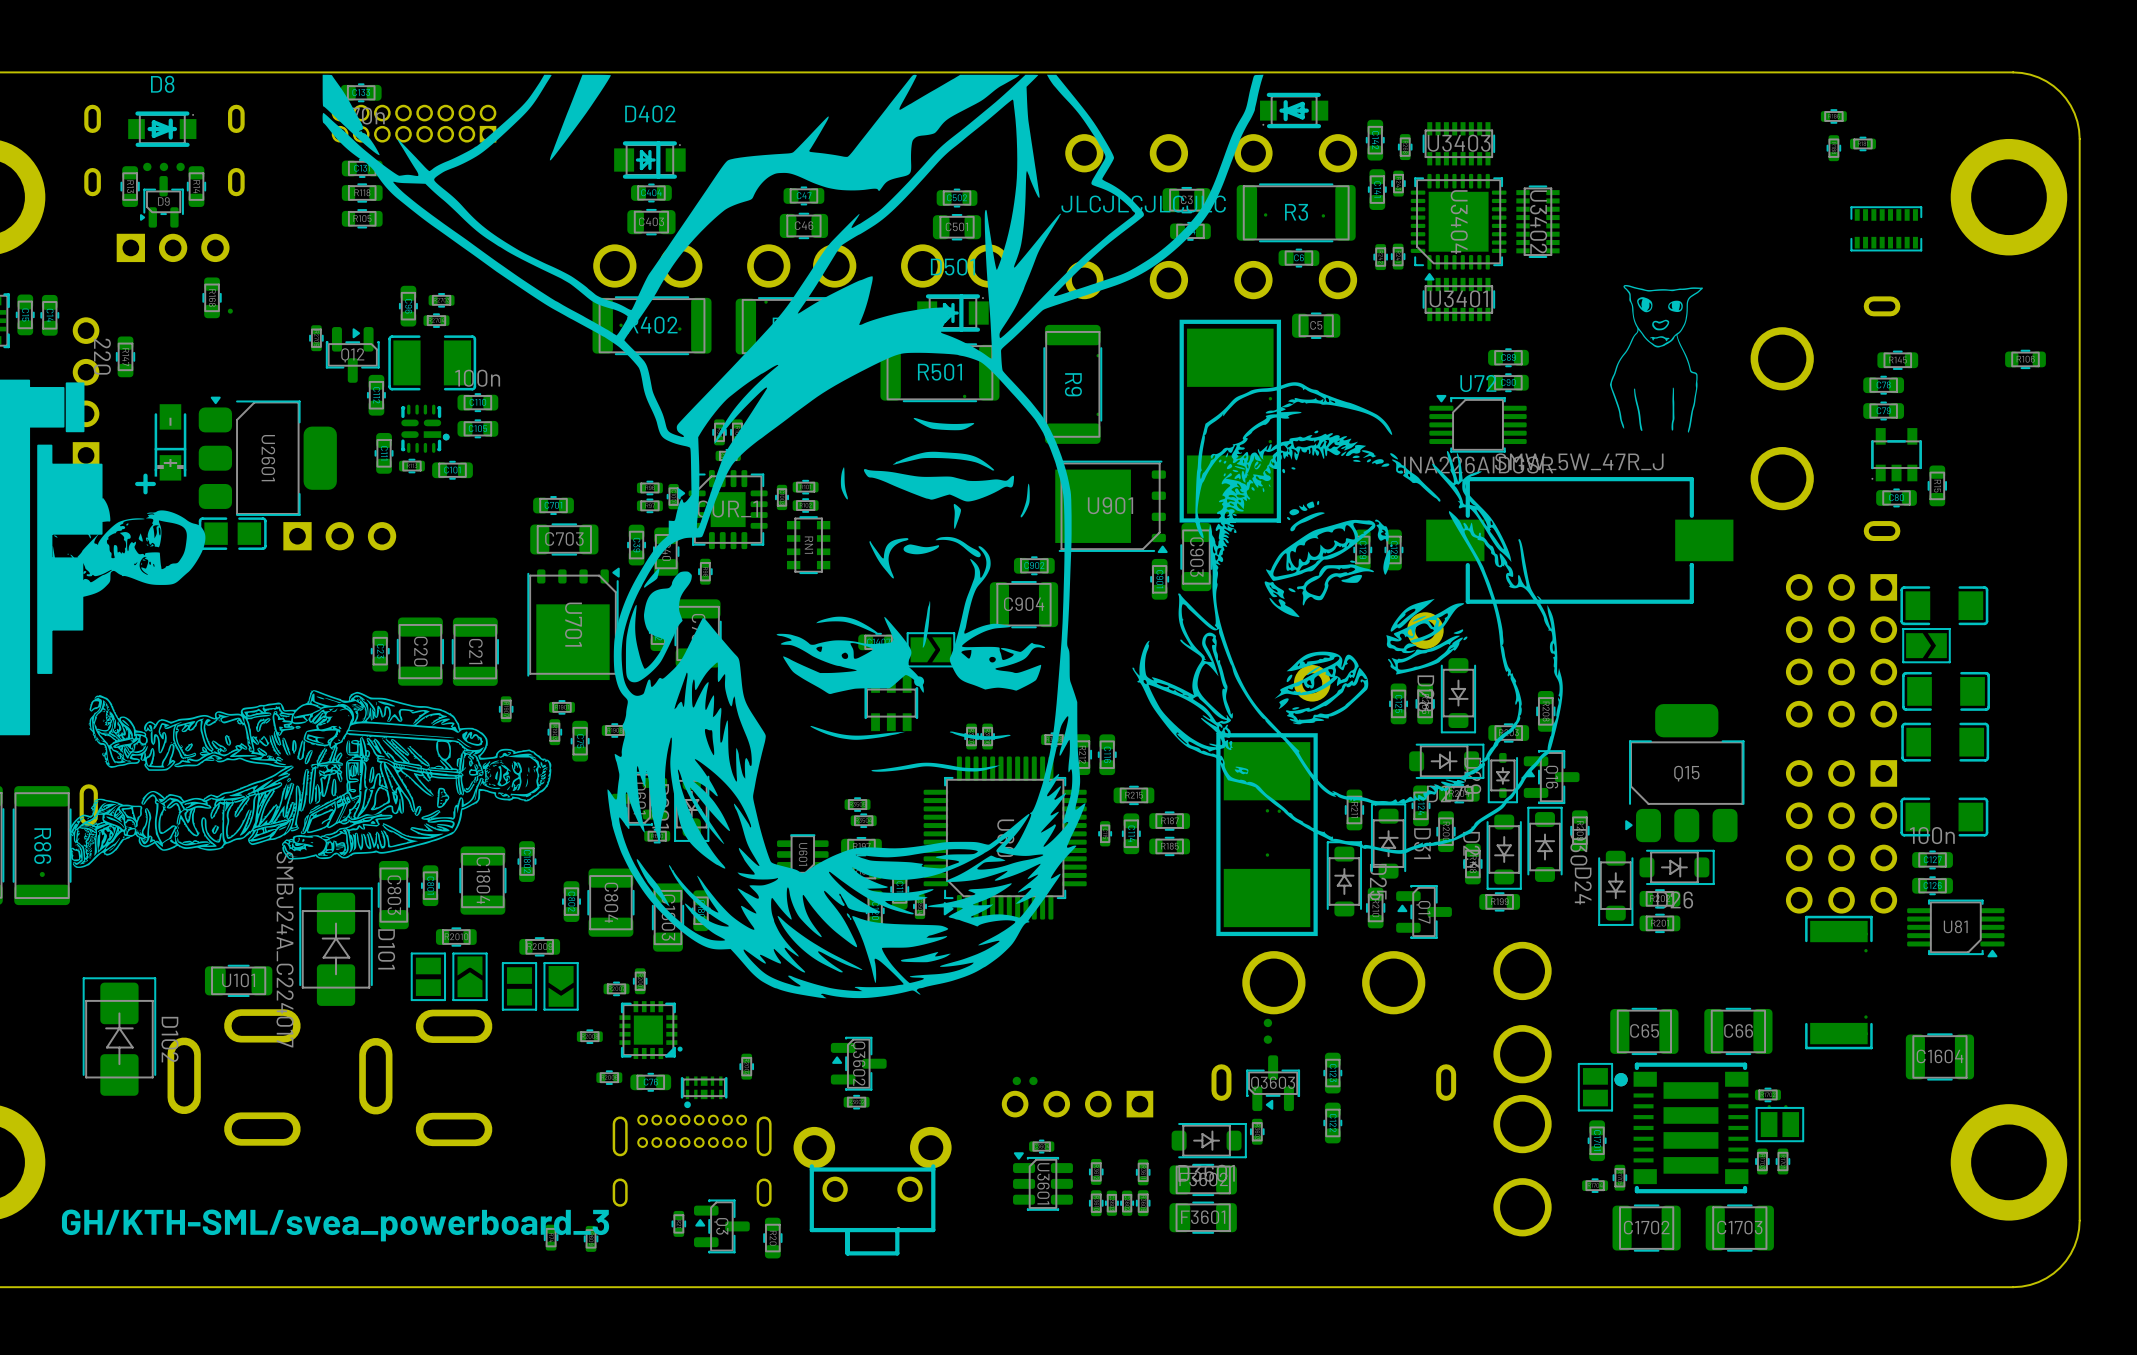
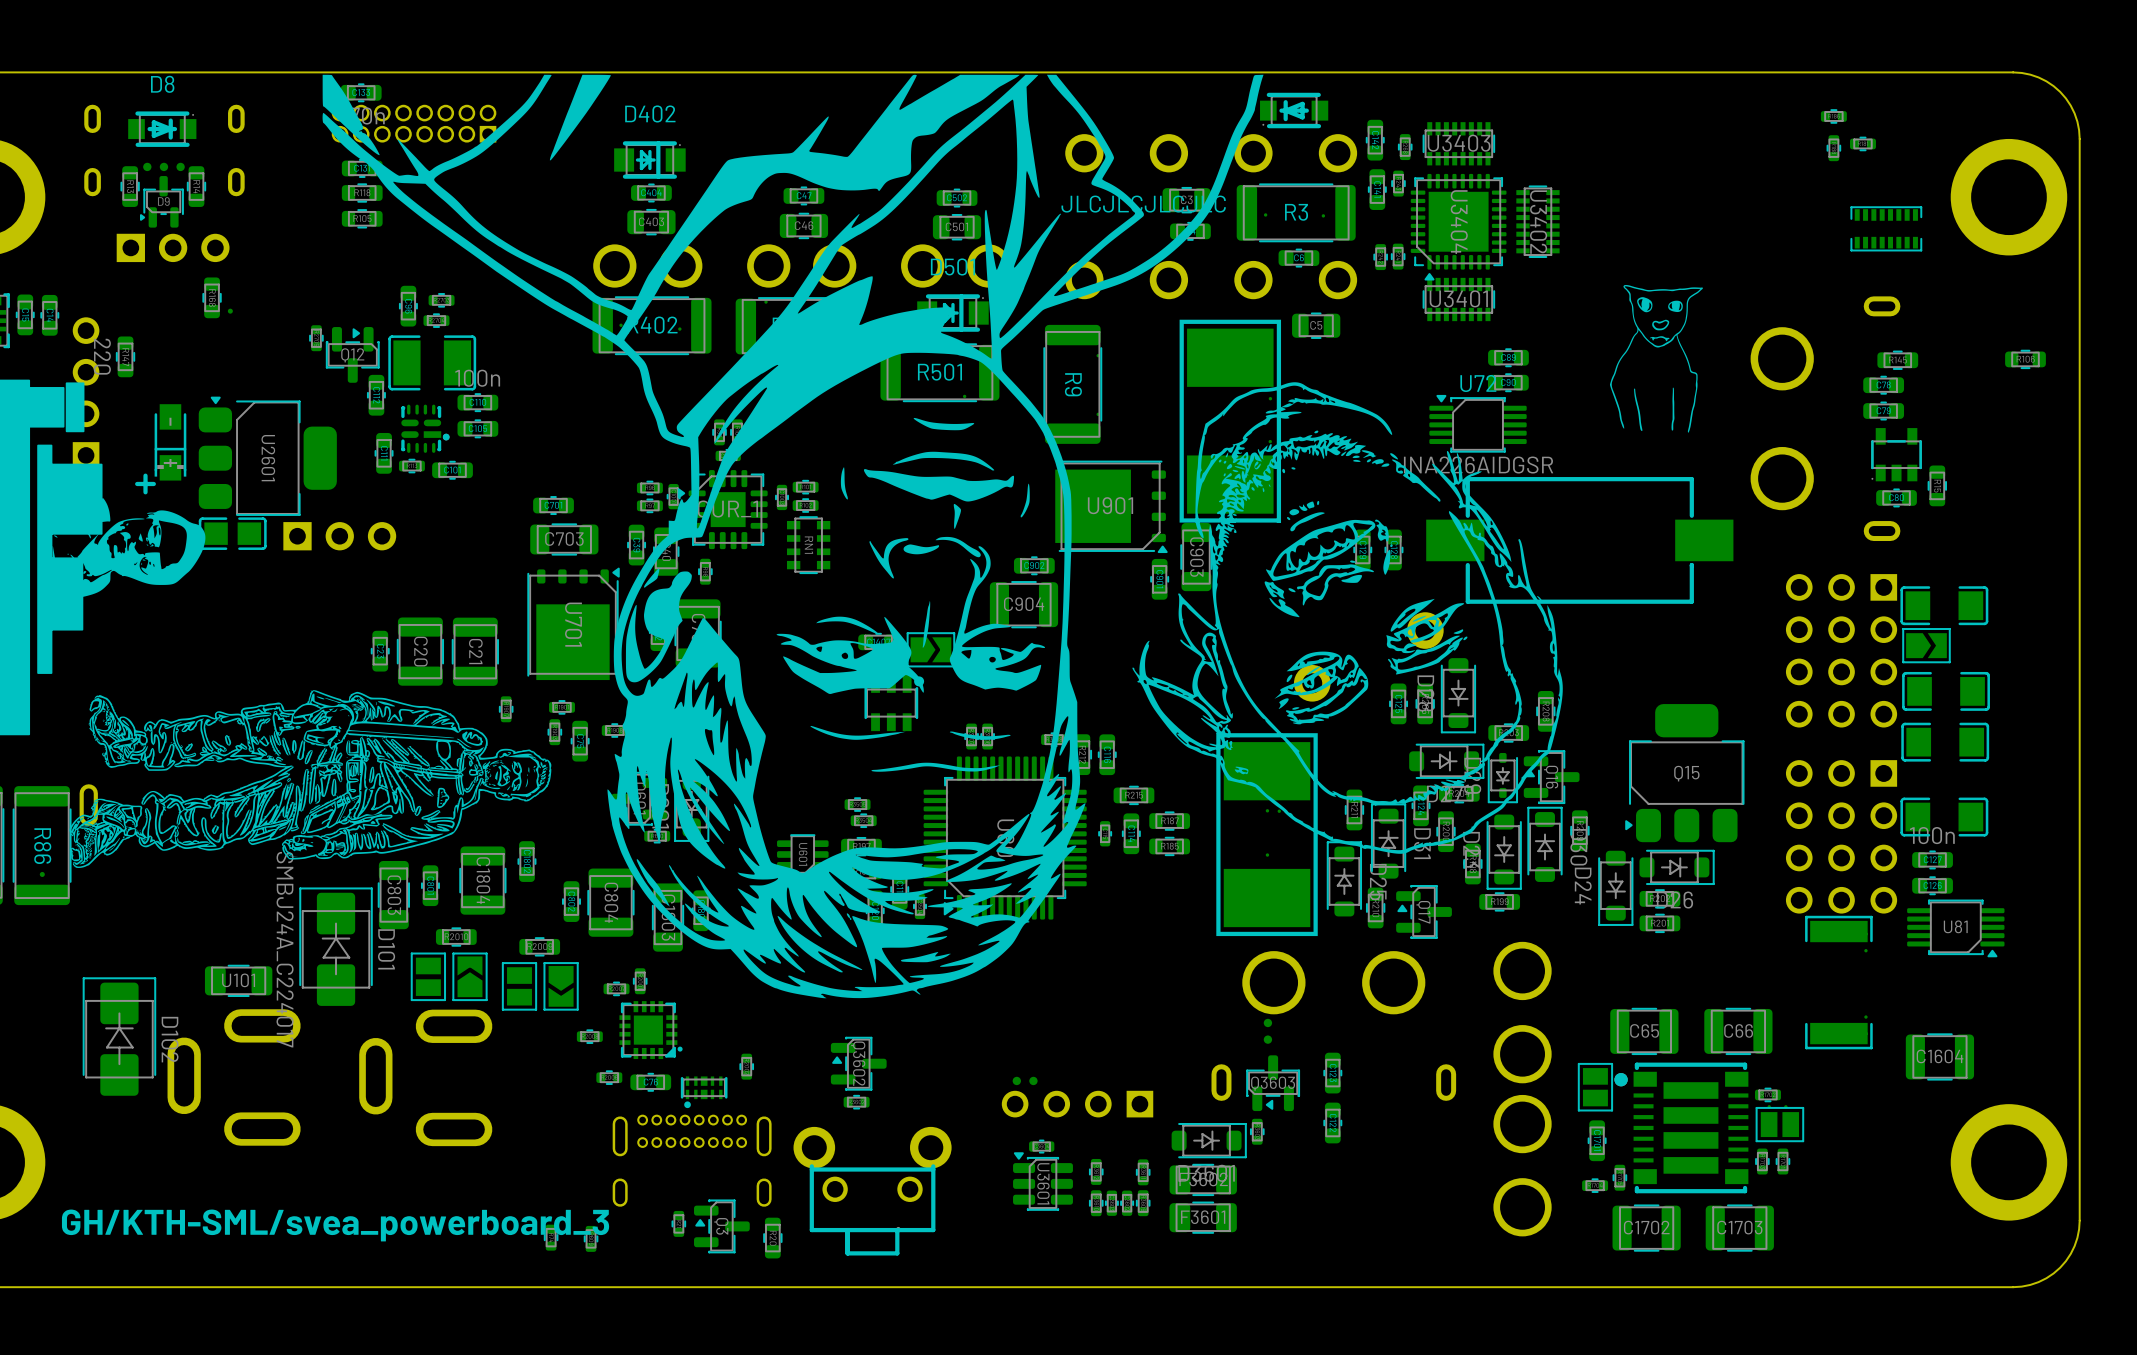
part value: SMW_5W_47R_J (1579, 461) -> none

